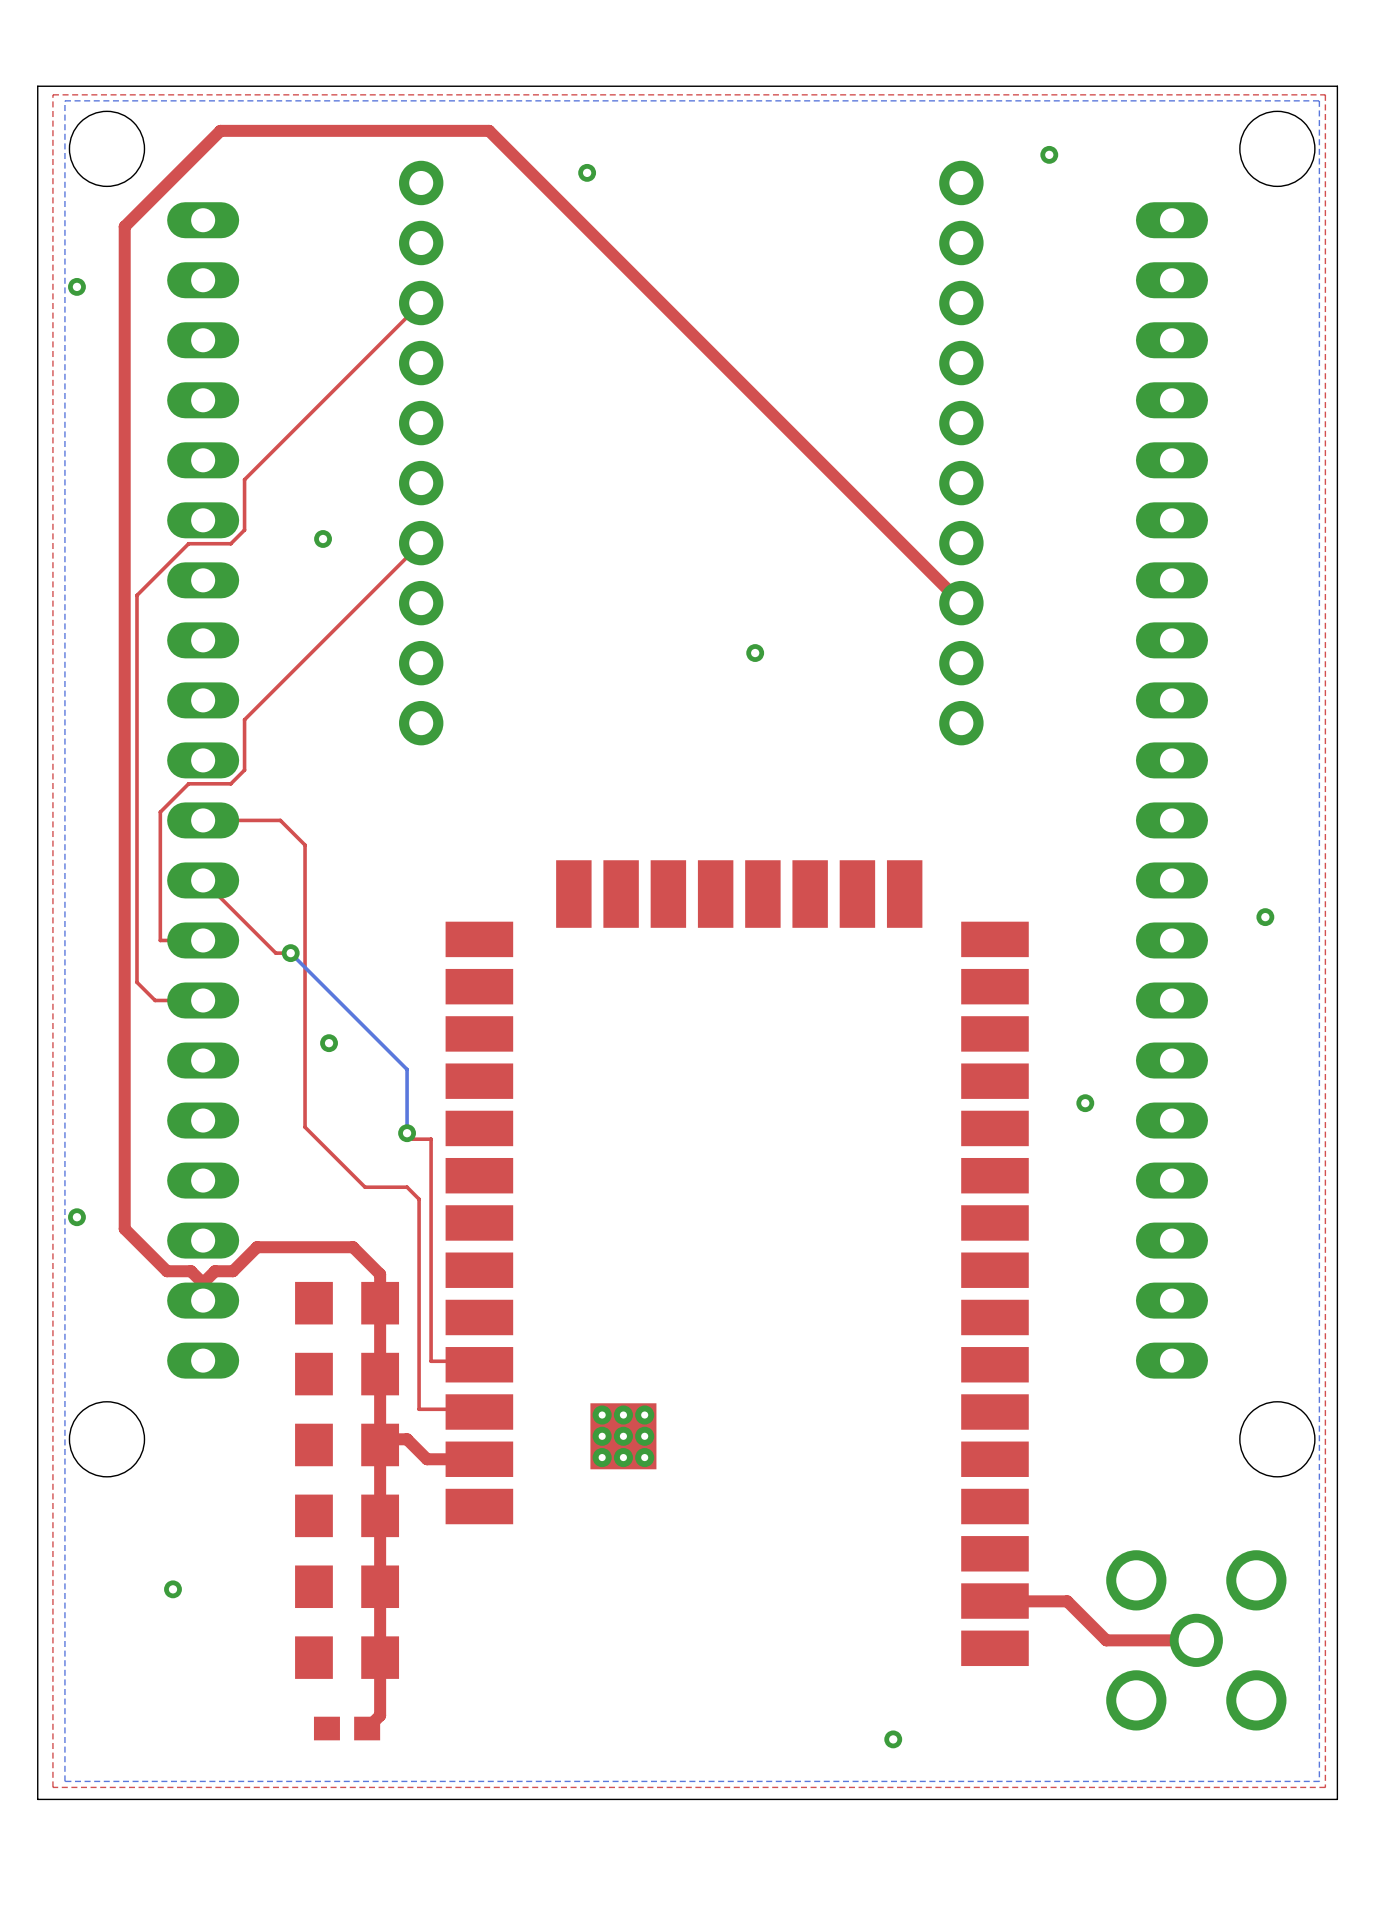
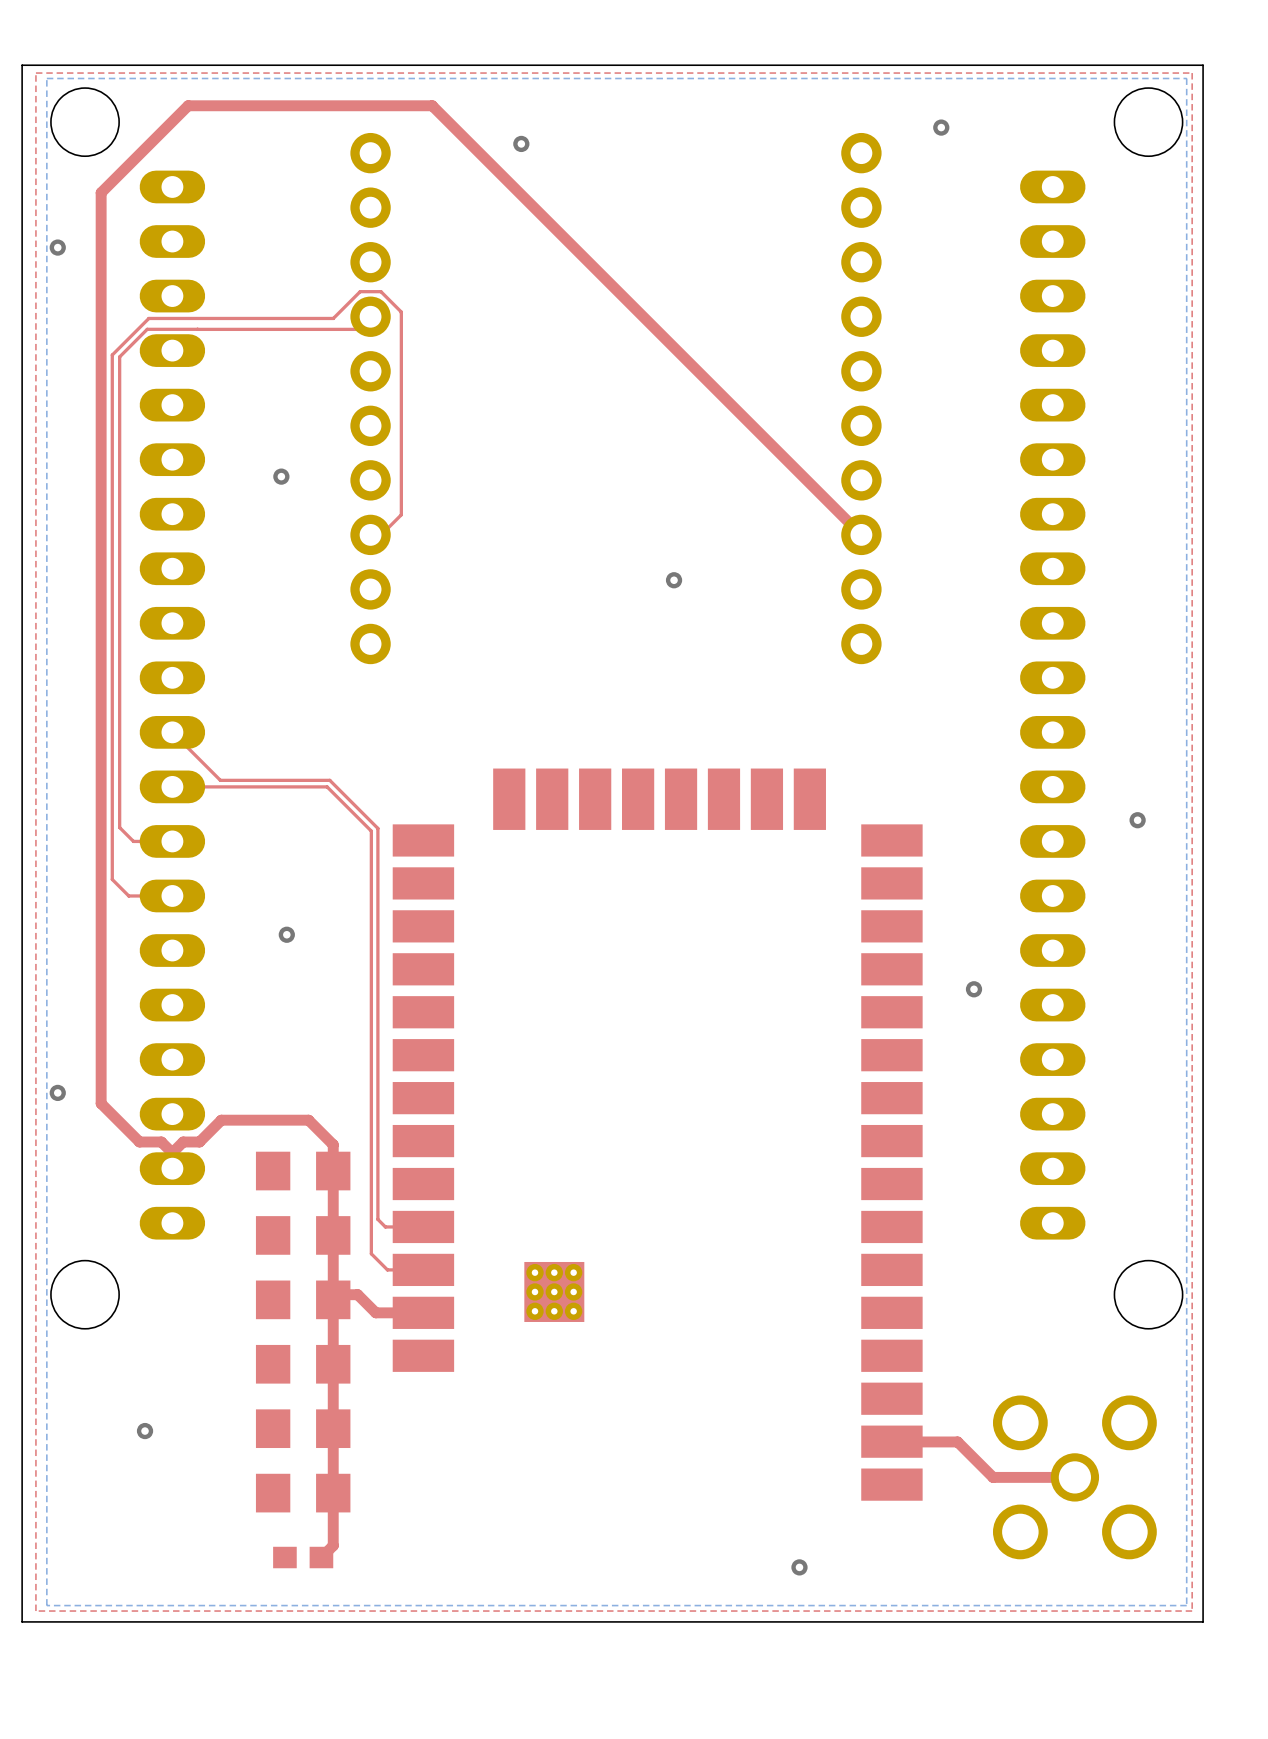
top track: (421, 303) (244, 479) (244, 530) (230, 543) (188, 543) (136, 595) -> (370, 534) (381, 534) (401, 514) (401, 312) (380, 291) (360, 291) (333, 318) (148, 318) (112, 355) (112, 527)
top track: (421, 543) (244, 719) (244, 770) (230, 783) (188, 783) (160, 812) (160, 940) -> (370, 316) (357, 329) (147, 329) (119, 356) (119, 827) (133, 841)
top track: (203, 820) (280, 820) (305, 845) (305, 1127) (365, 1187) (407, 1187) (419, 1199) (419, 1409) (455, 1409) -> (172, 732) (220, 780) (329, 780) (377, 828) (377, 1219) (385, 1226) (423, 1226)
top track: (203, 880) (275, 953) (290, 953) -> (172, 786) (327, 786) (371, 831) (371, 1253) (387, 1269) (423, 1269)
bottom track: (290, 953) (407, 1069) (407, 1133) -> none
via: (290, 953) -> none
top track: (407, 1133) (413, 1139) (431, 1139) (431, 1361) (455, 1361) -> none
via: (407, 1133) -> none

